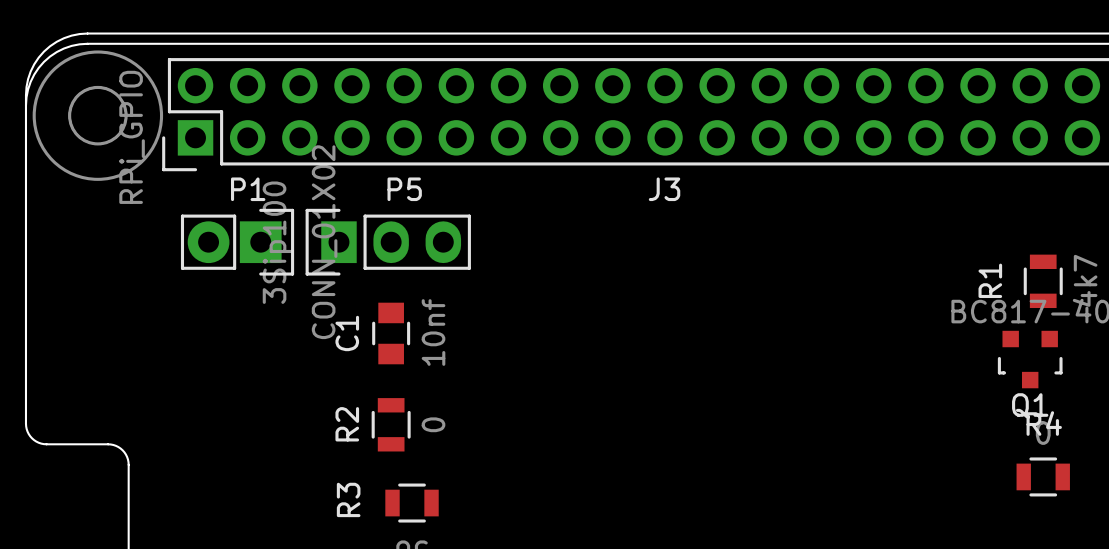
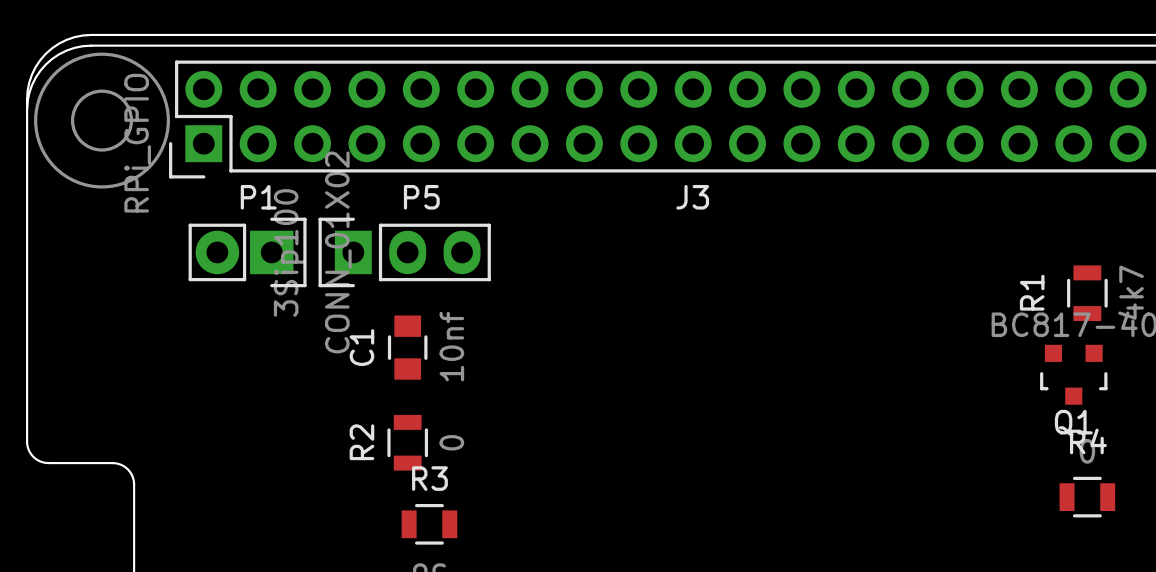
R3 name rotation: 0° (348, 499) -> 90° clockwise (429, 478)
R3 name position: R3 (348, 499) -> R3 (429, 478)

